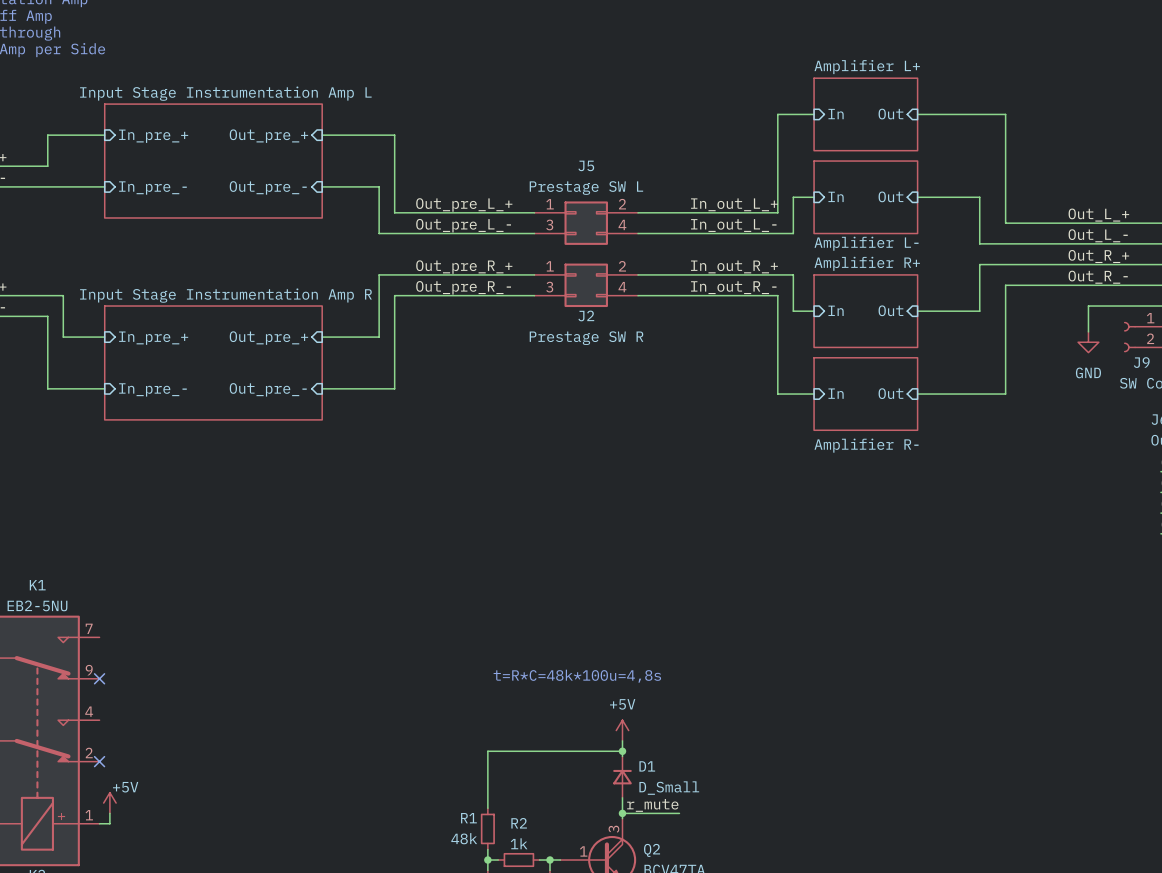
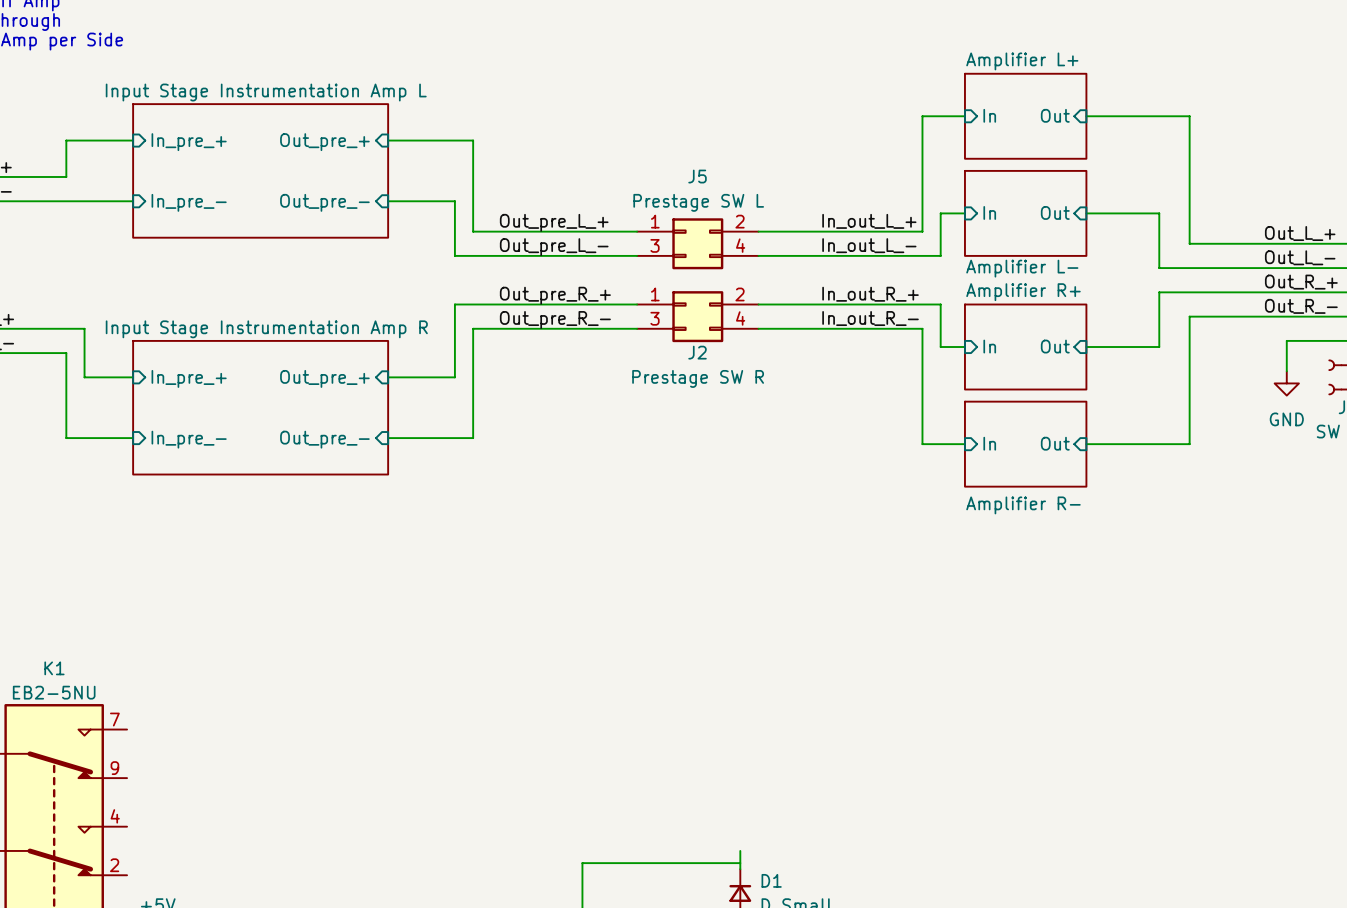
text: t=R*C=48k*100u=4,8s (577, 676) -> none
no-connect mark: (99, 678) -> none
power symbol: +5V (622, 730) -> none
junction: (622, 751) -> none
no-connect mark: (99, 761) -> none

